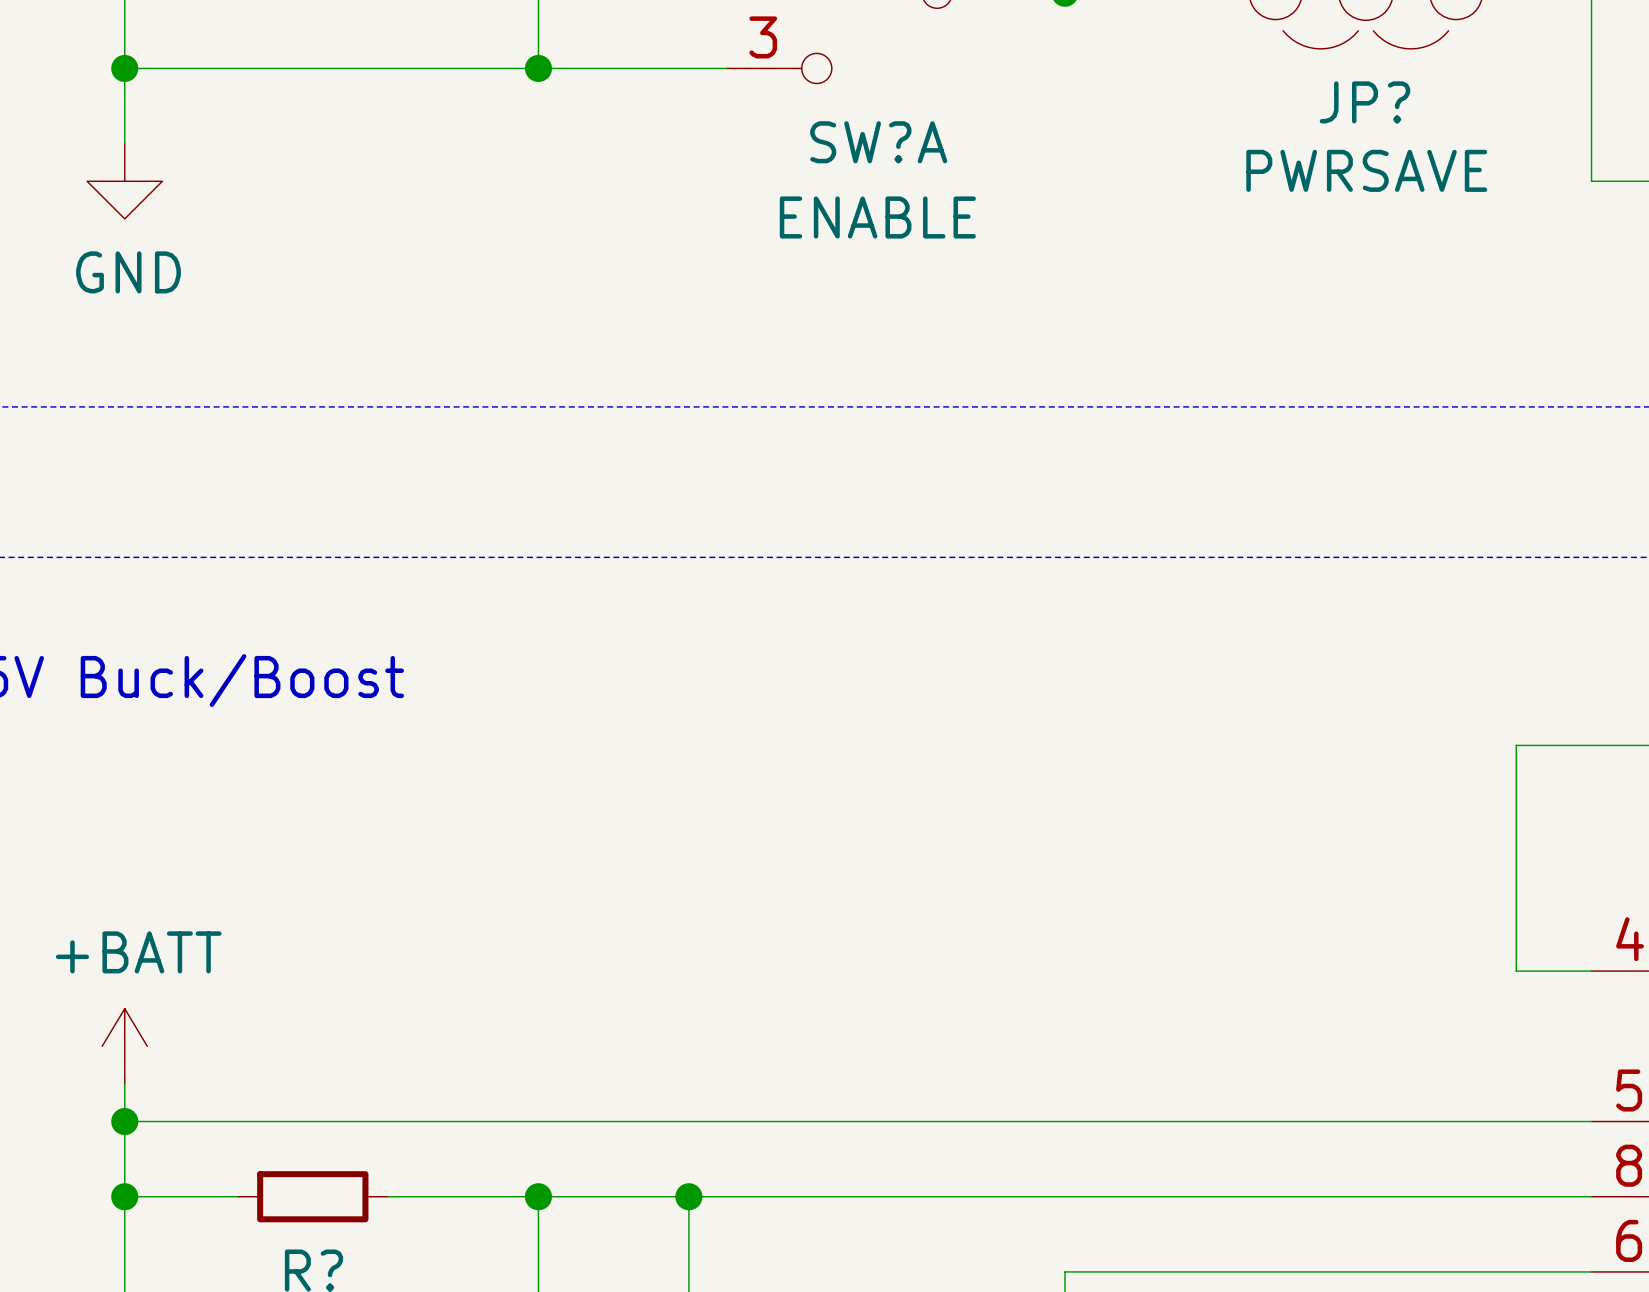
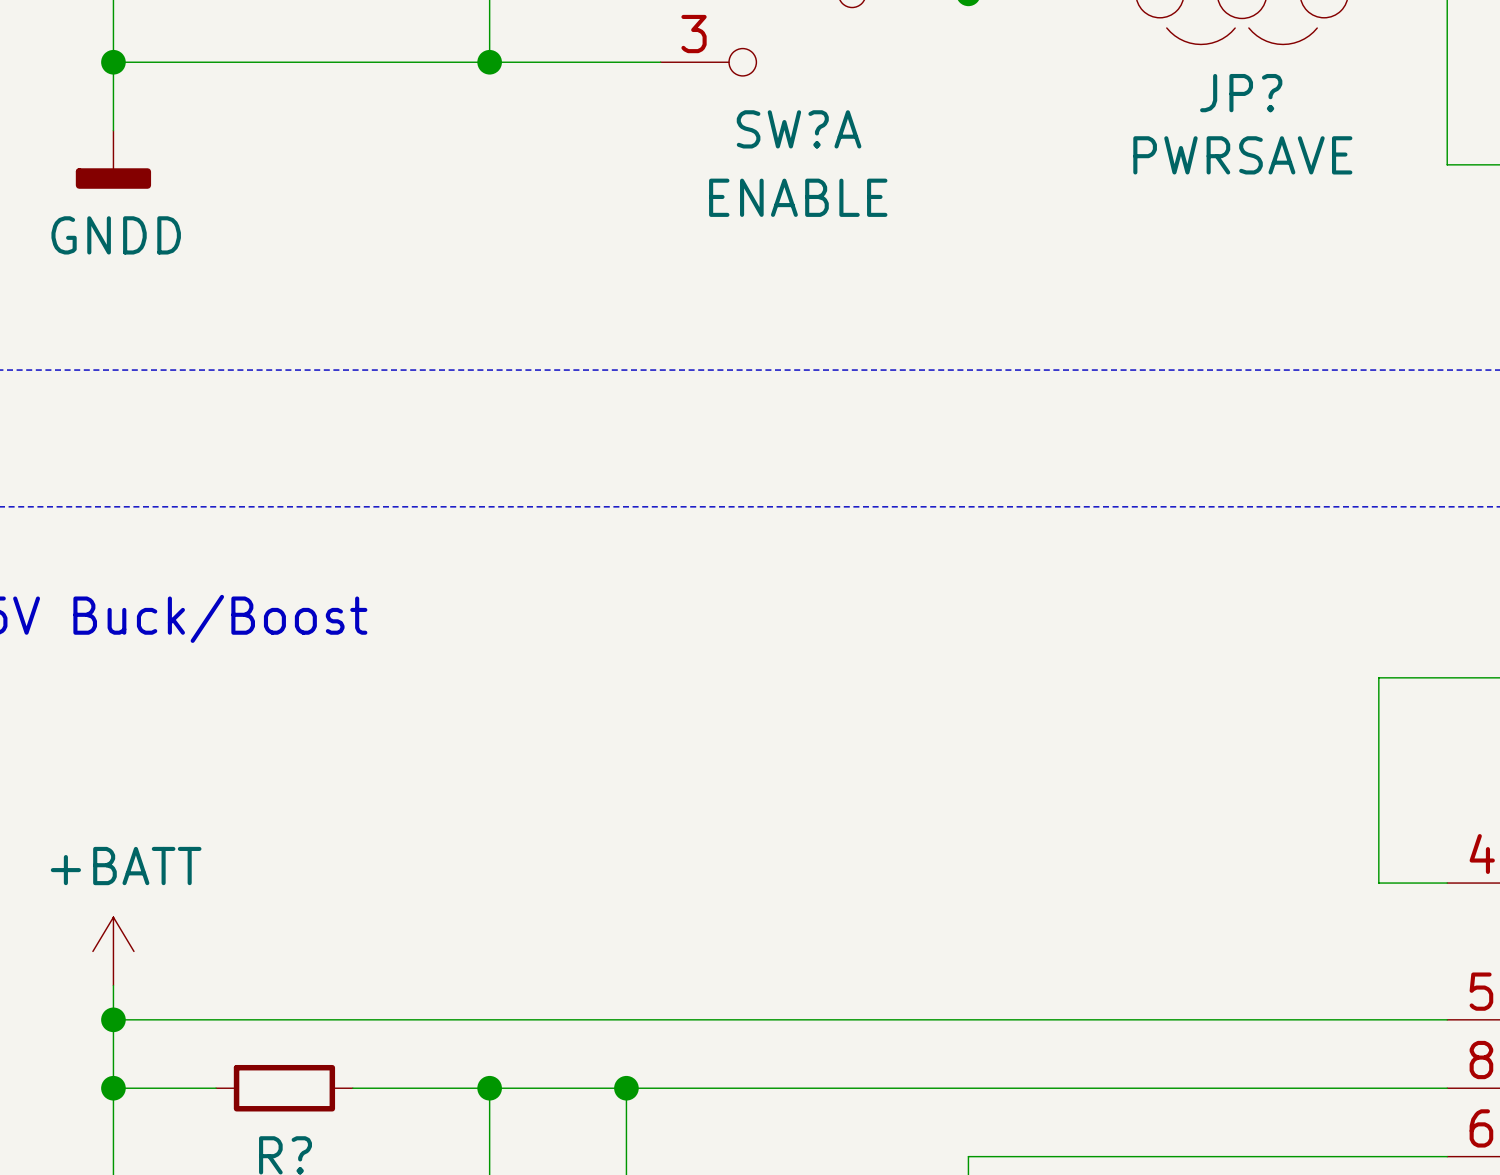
power symbol: GND (124, 181) -> GNDD (113, 159)

